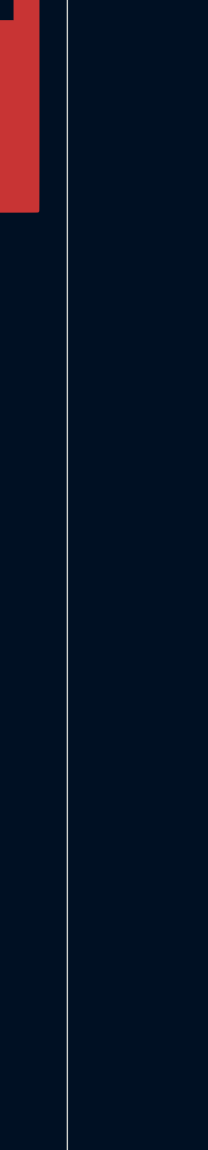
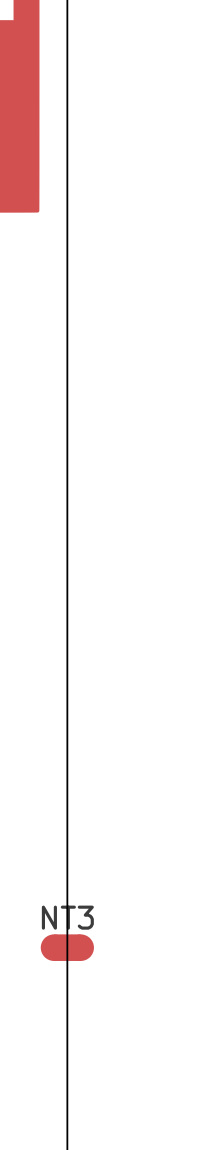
NT3: none -> (67, 947)

